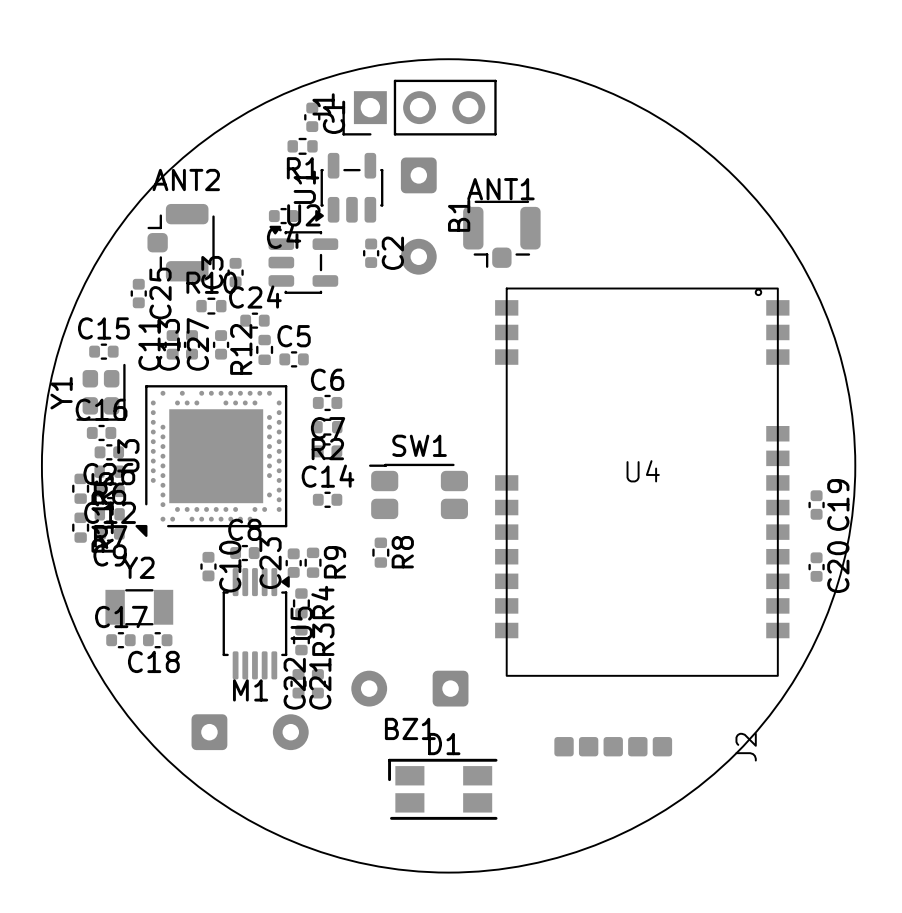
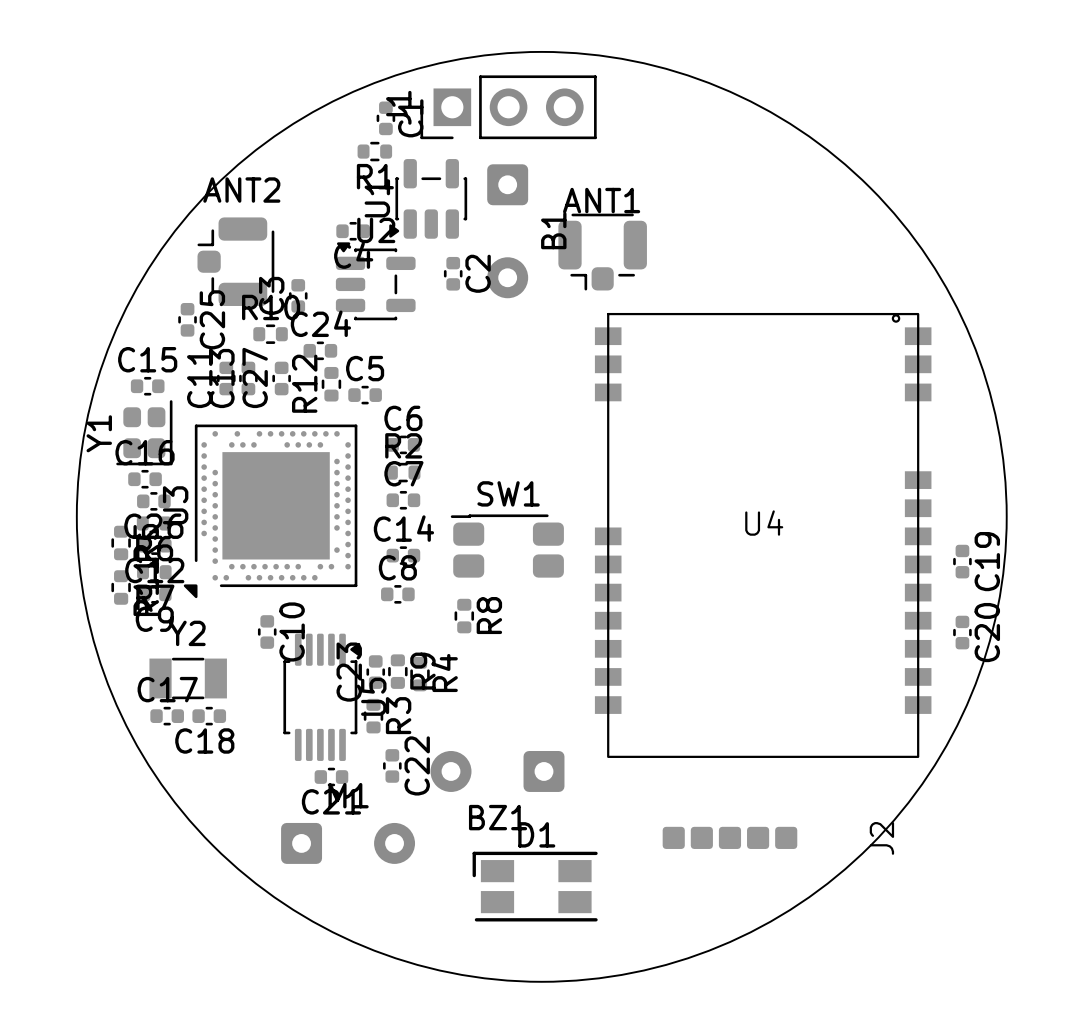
R2 name position: R2 (327, 449) -> R2 (403, 445)
C8 position: (244, 553) -> (397, 594)
R9 position: (313, 562) -> (397, 671)
C23 position: (293, 563) -> (375, 672)
R4 position: (301, 603) -> (420, 674)
C22 name position: C22 (294, 683) -> C22 (417, 765)
C21 rotation: 0° (298, 683) -> 90° clockwise (331, 777)
C21 position: (298, 683) -> (331, 777)
M1 position: (250, 732) -> (348, 843)

